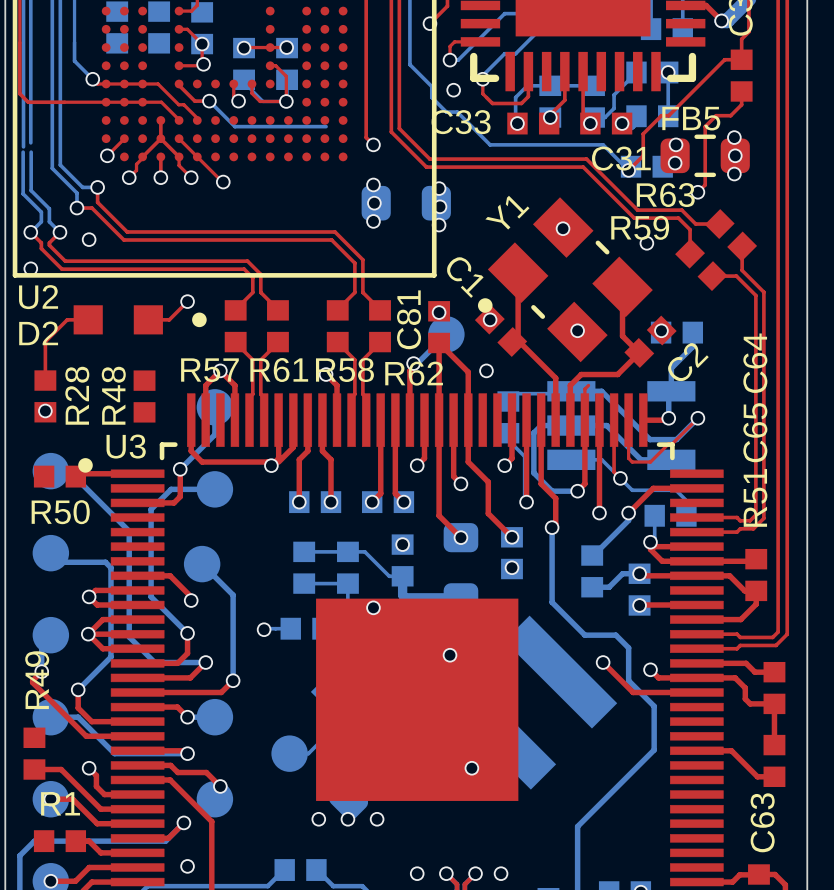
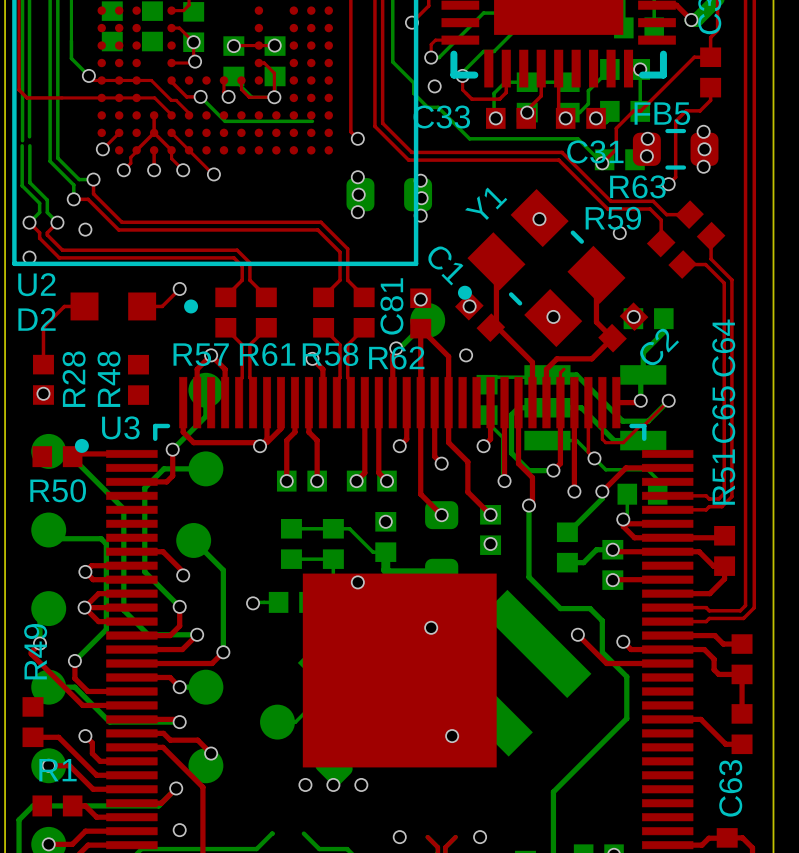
part: (300, 870) -> none
via: (446, 873) -> none
via: (475, 873) -> none

